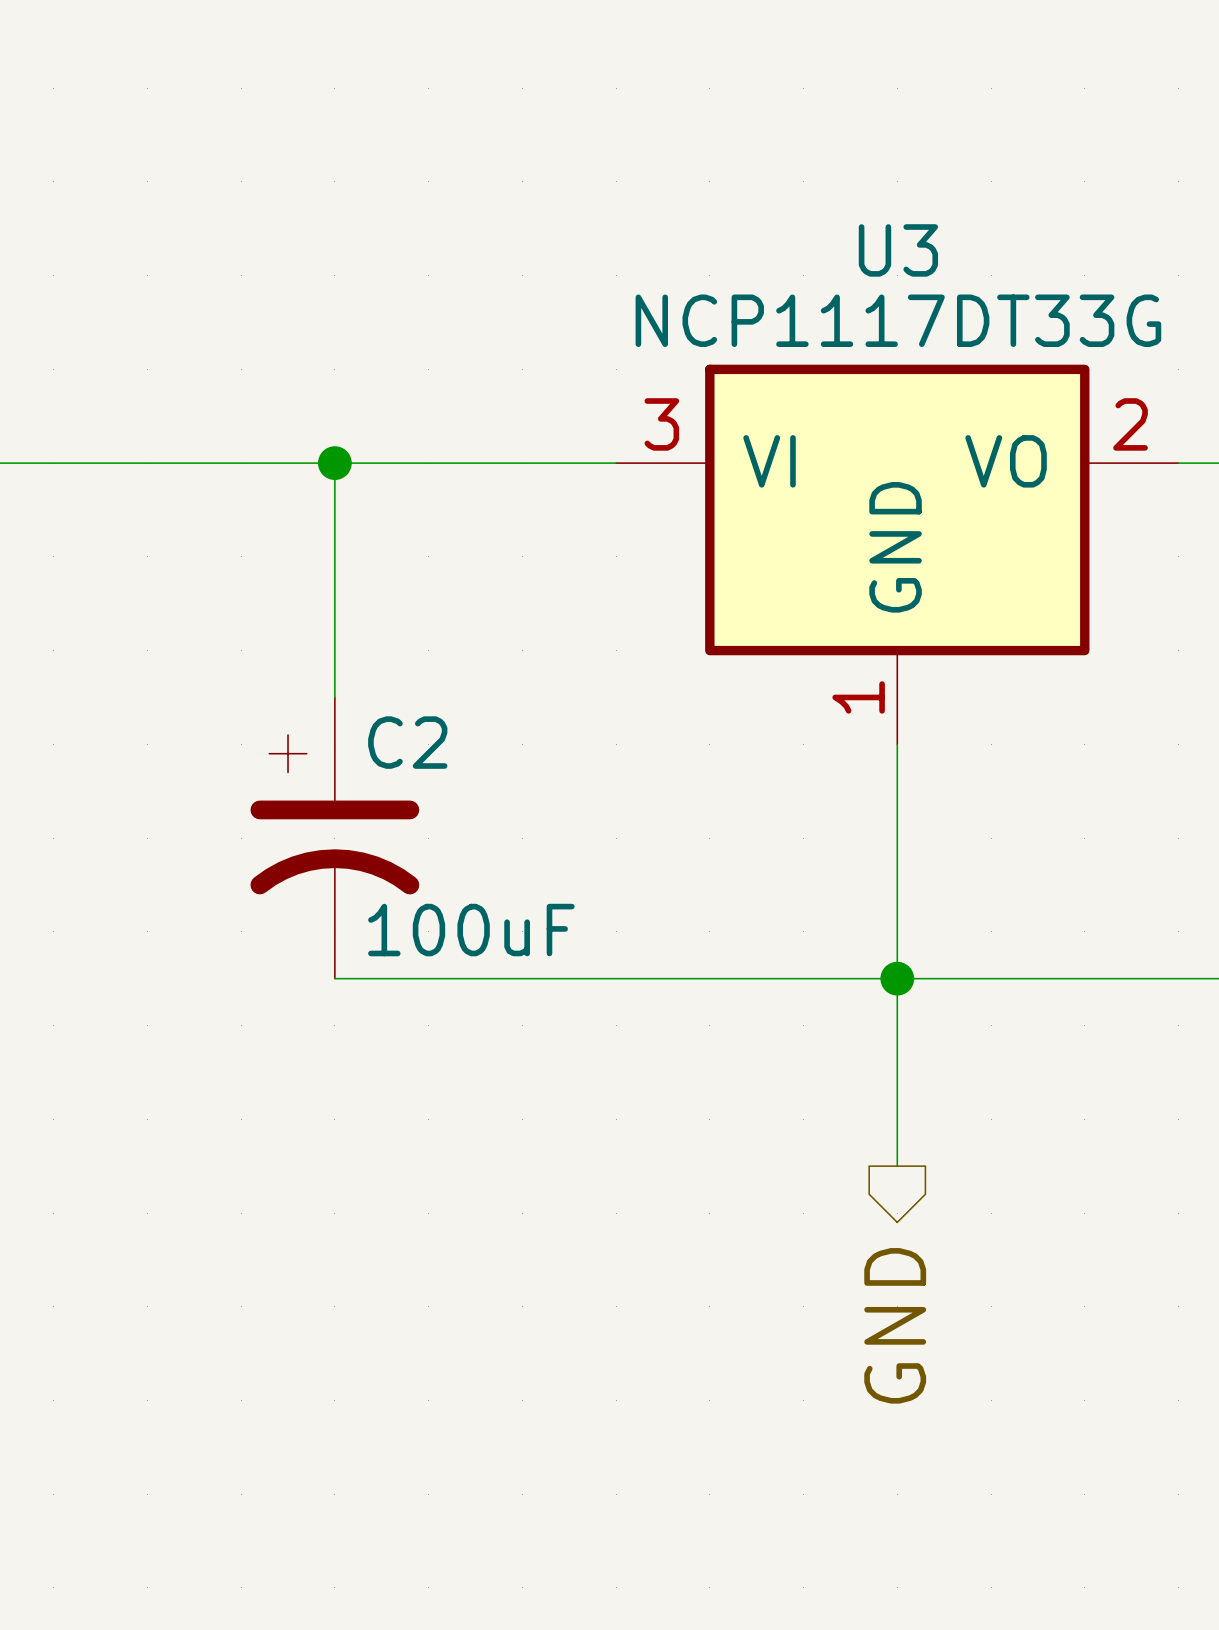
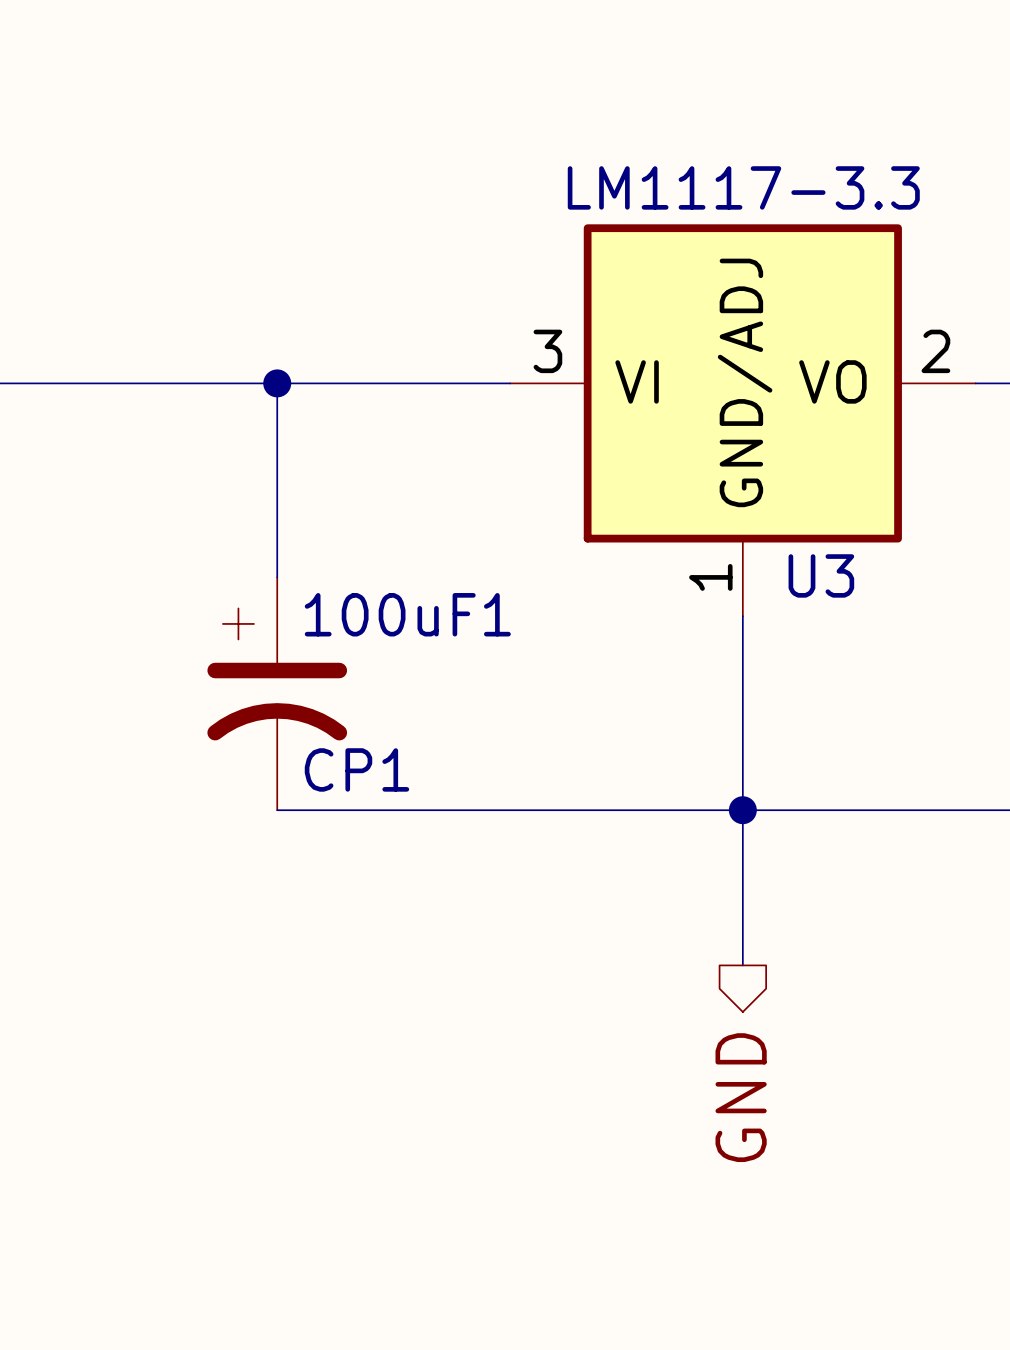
U3 name position: U3 (898, 250) -> U3 (821, 575)
U3 value: NCP1117DT33G (898, 320) -> LM1117-3.3 (743, 187)
U3 symbol: [616, 364, 1179, 745] -> [510, 224, 976, 617]
C2 name: C2 (407, 742) -> 100uF1 (407, 614)
C2 value: 100uF (471, 930) -> CP1 (356, 769)

